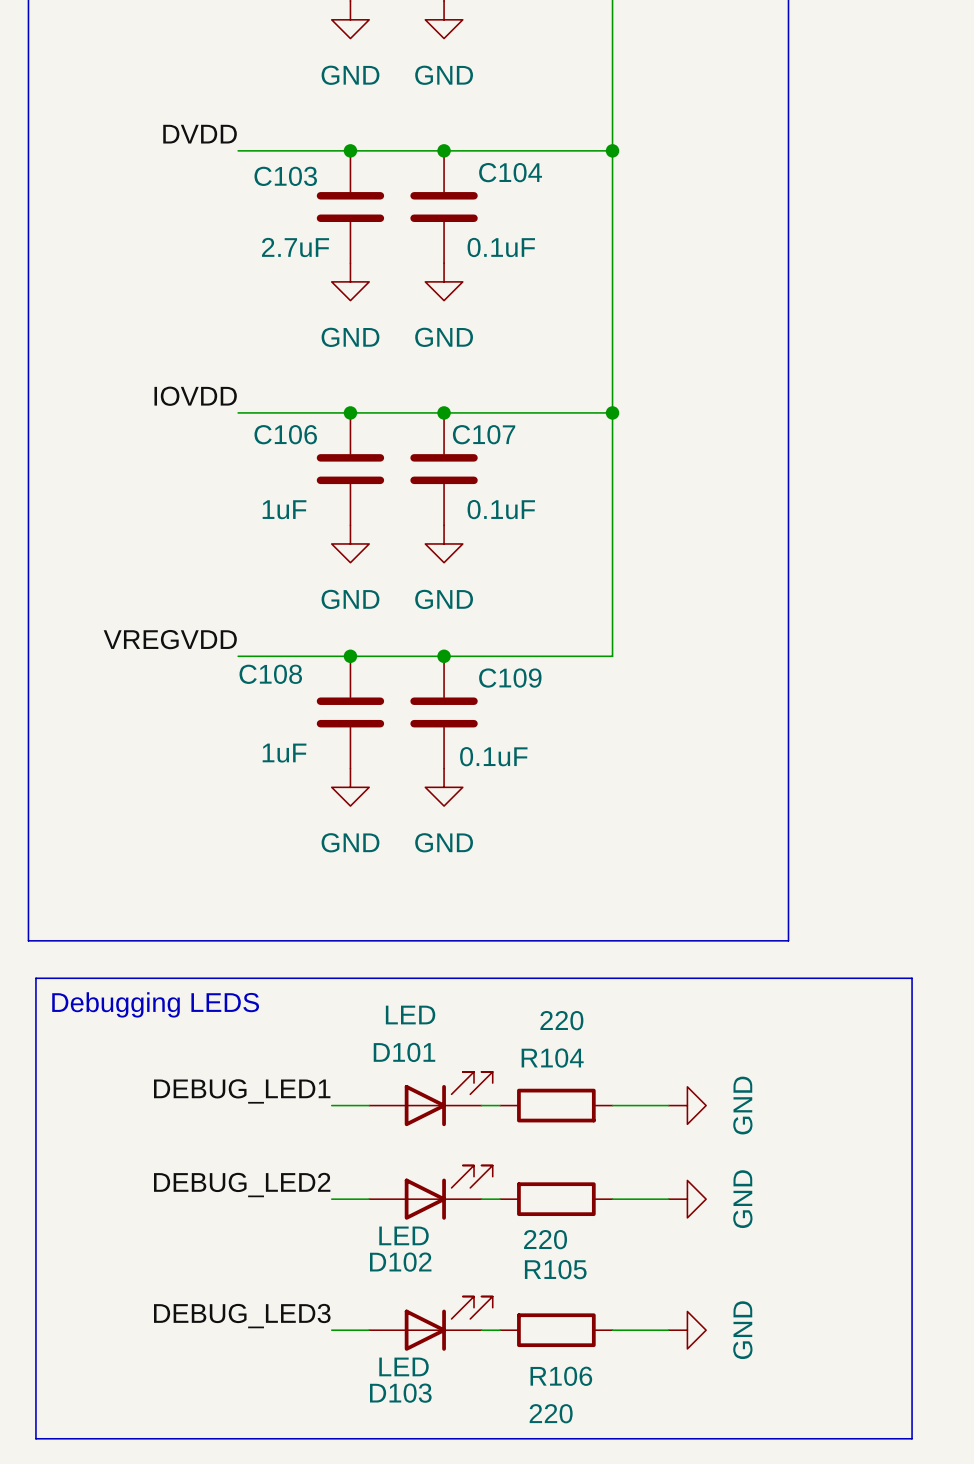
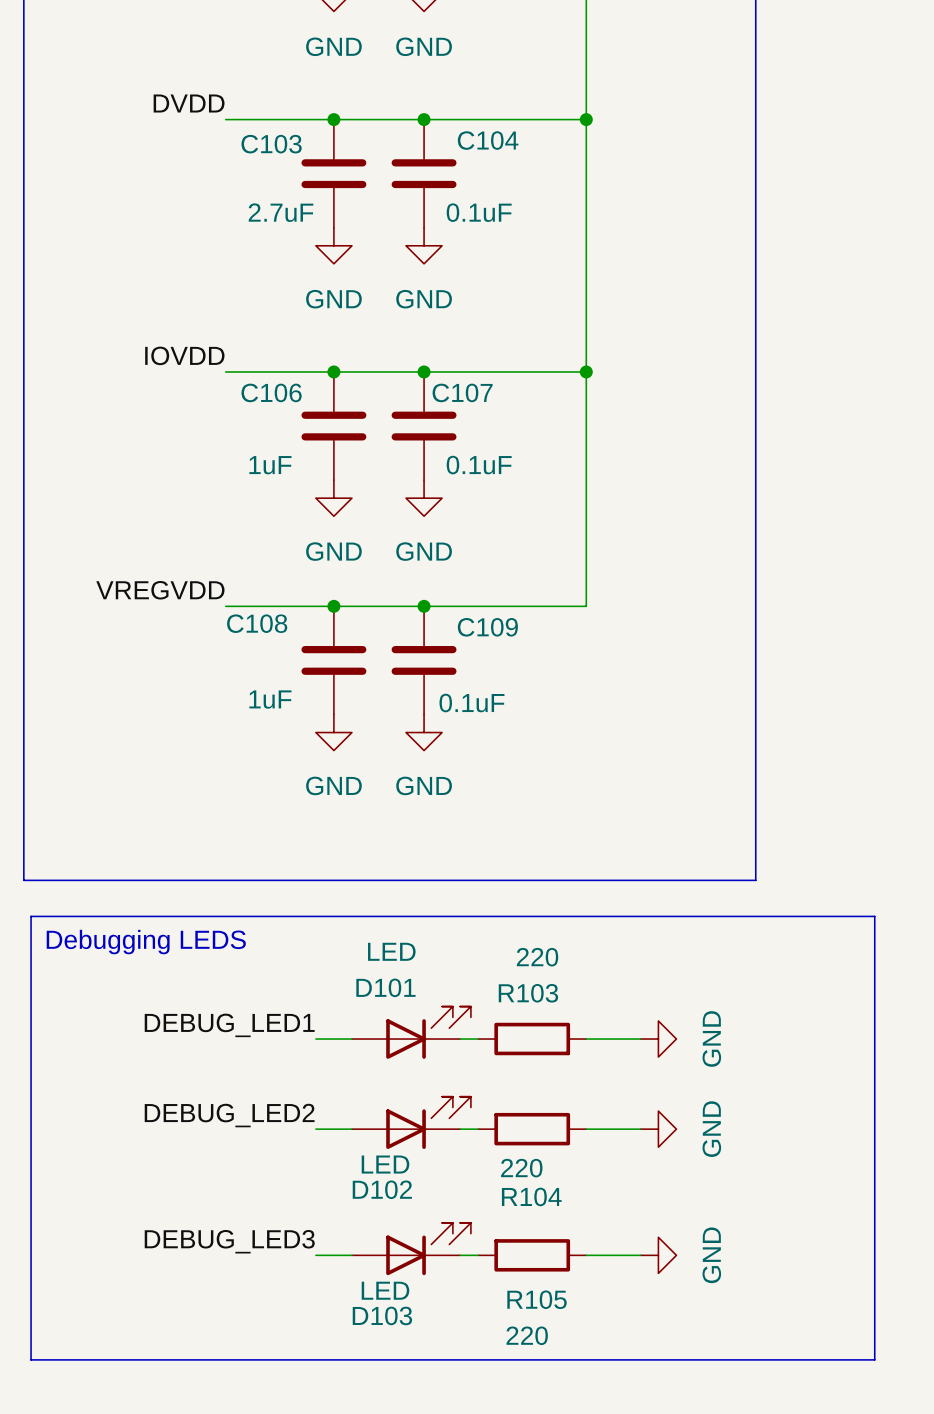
R104 name: R104 (552, 1058) -> R103 (528, 993)
R105 name: R105 (555, 1269) -> R104 (531, 1196)
R106 name: R106 (561, 1376) -> R105 (537, 1299)

